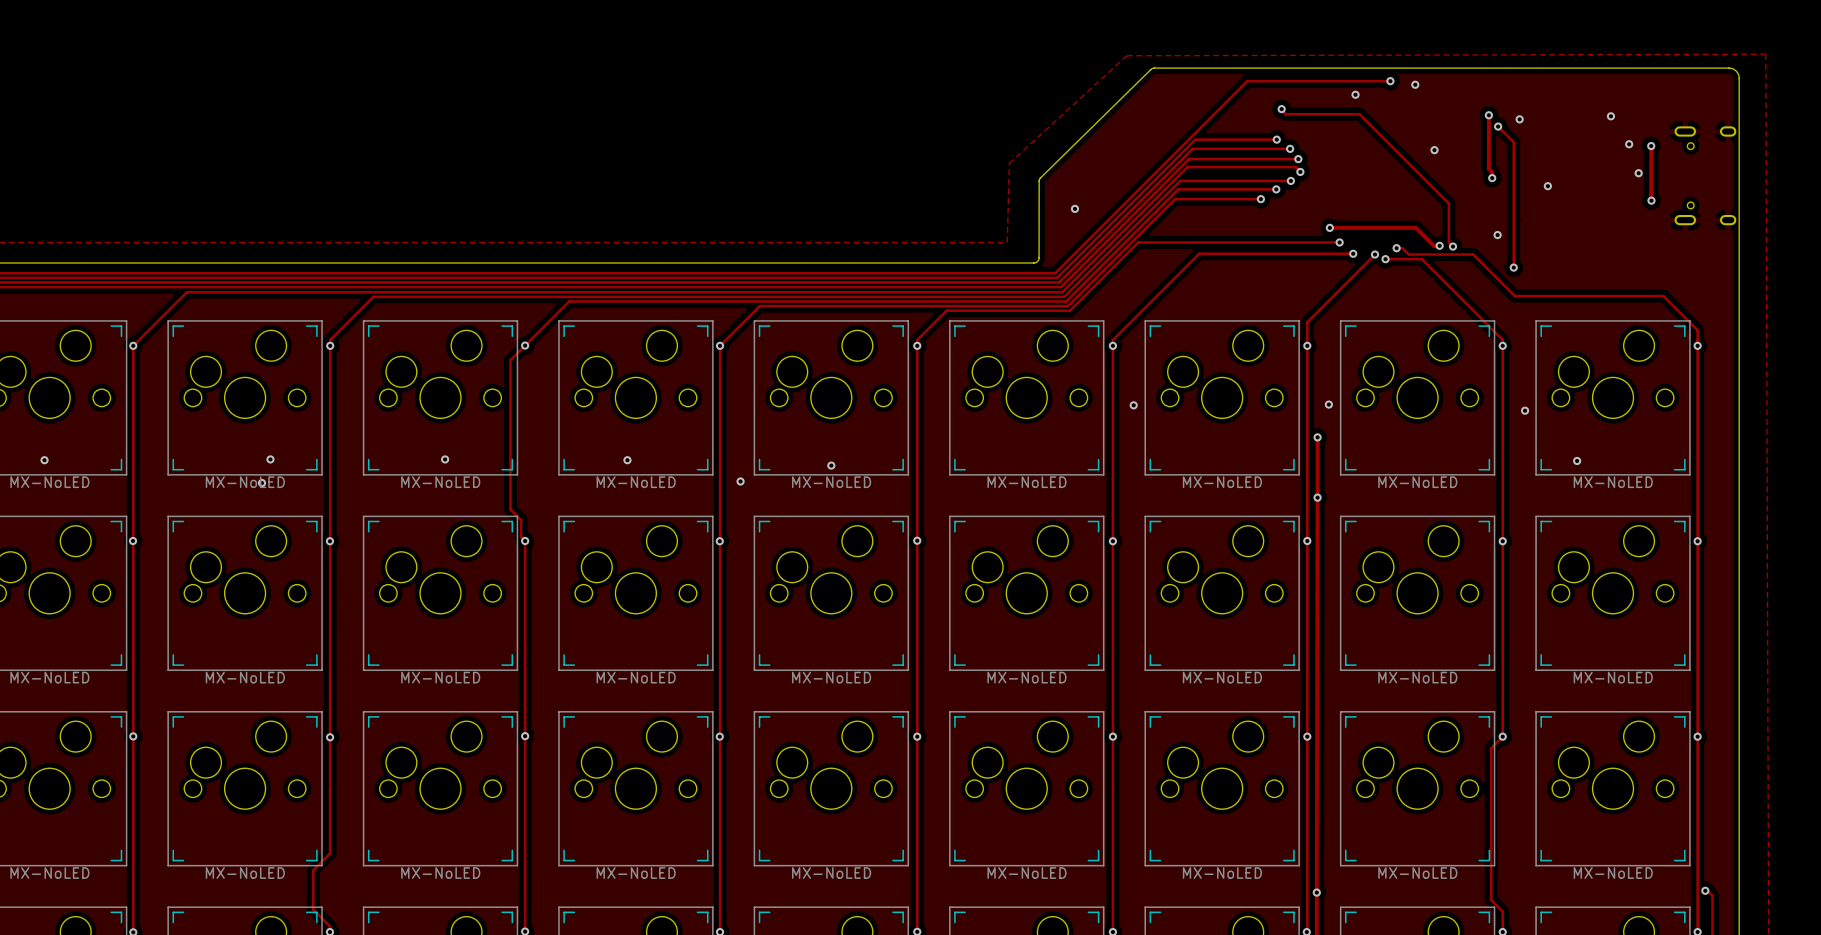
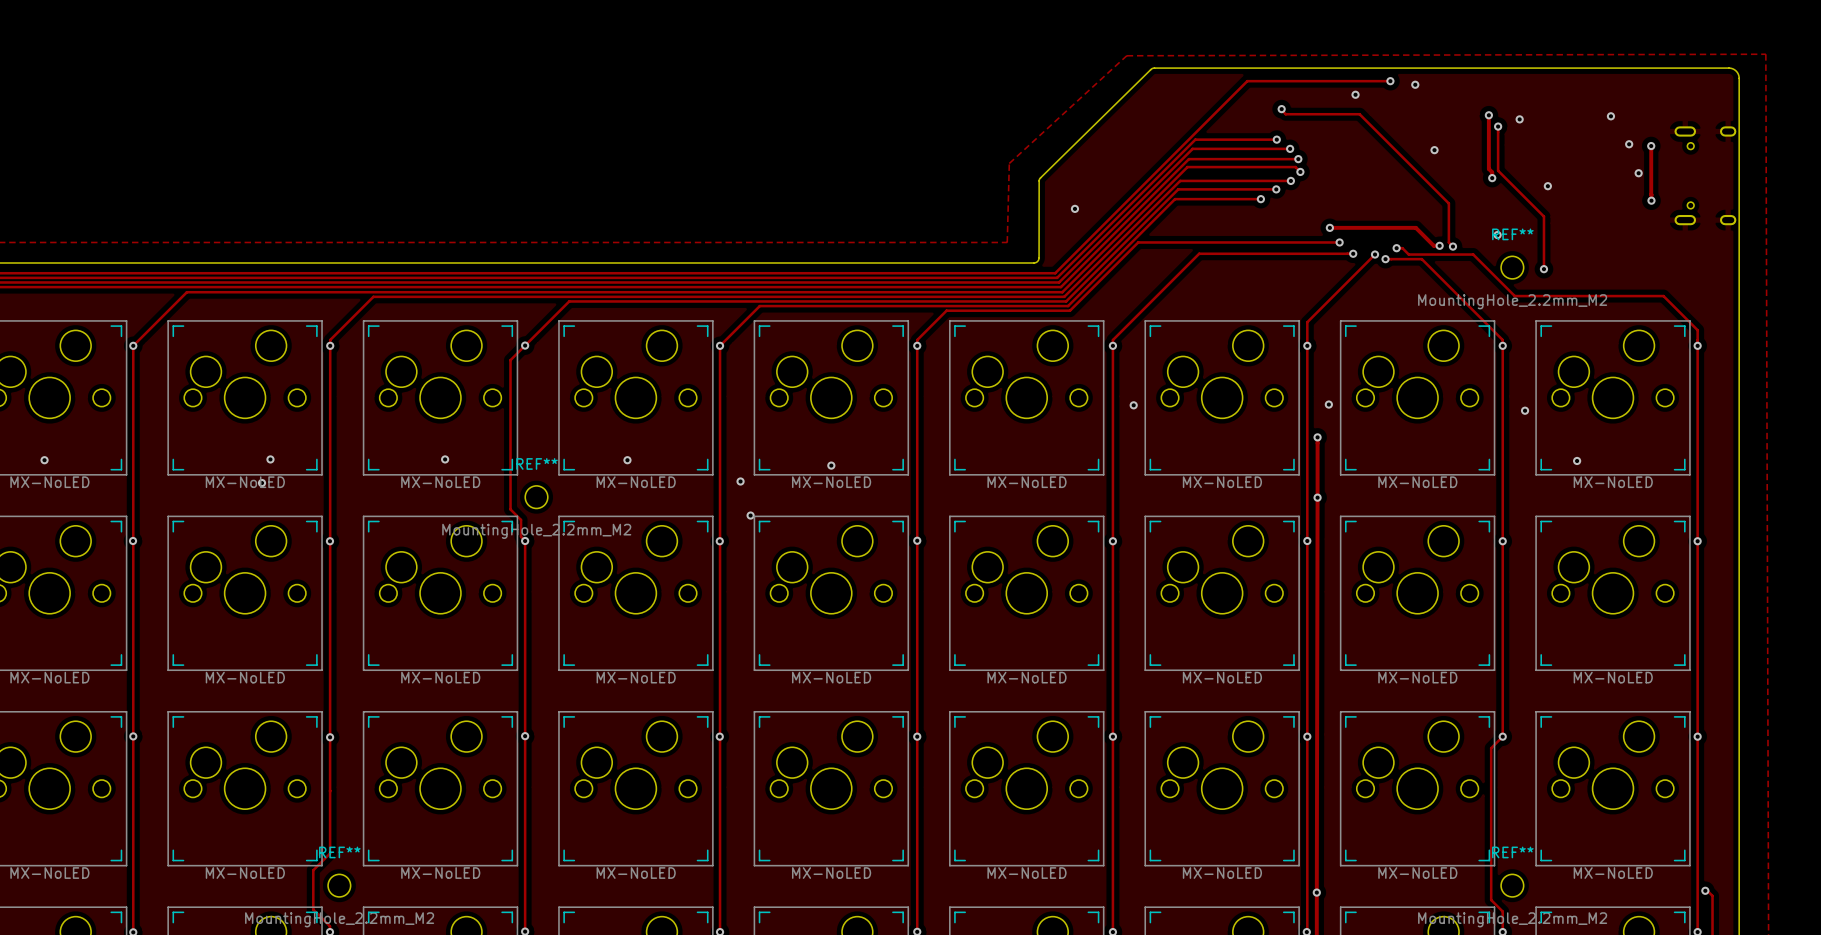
track: (1498, 126) (1513, 142) (1513, 267) -> (1498, 126) (1498, 170) (1543, 216) (1543, 269)
REF**: none -> MountingHole_2.2mm_M2 (1512, 267)
via position: (1513, 267) -> (1543, 269)
REF**: none -> MountingHole_2.2mm_M2 (536, 497)
via: none -> (750, 515)
REF**: none -> MountingHole_2.2mm_M2 (339, 885)
REF**: none -> MountingHole_2.2mm_M2 (1512, 885)

